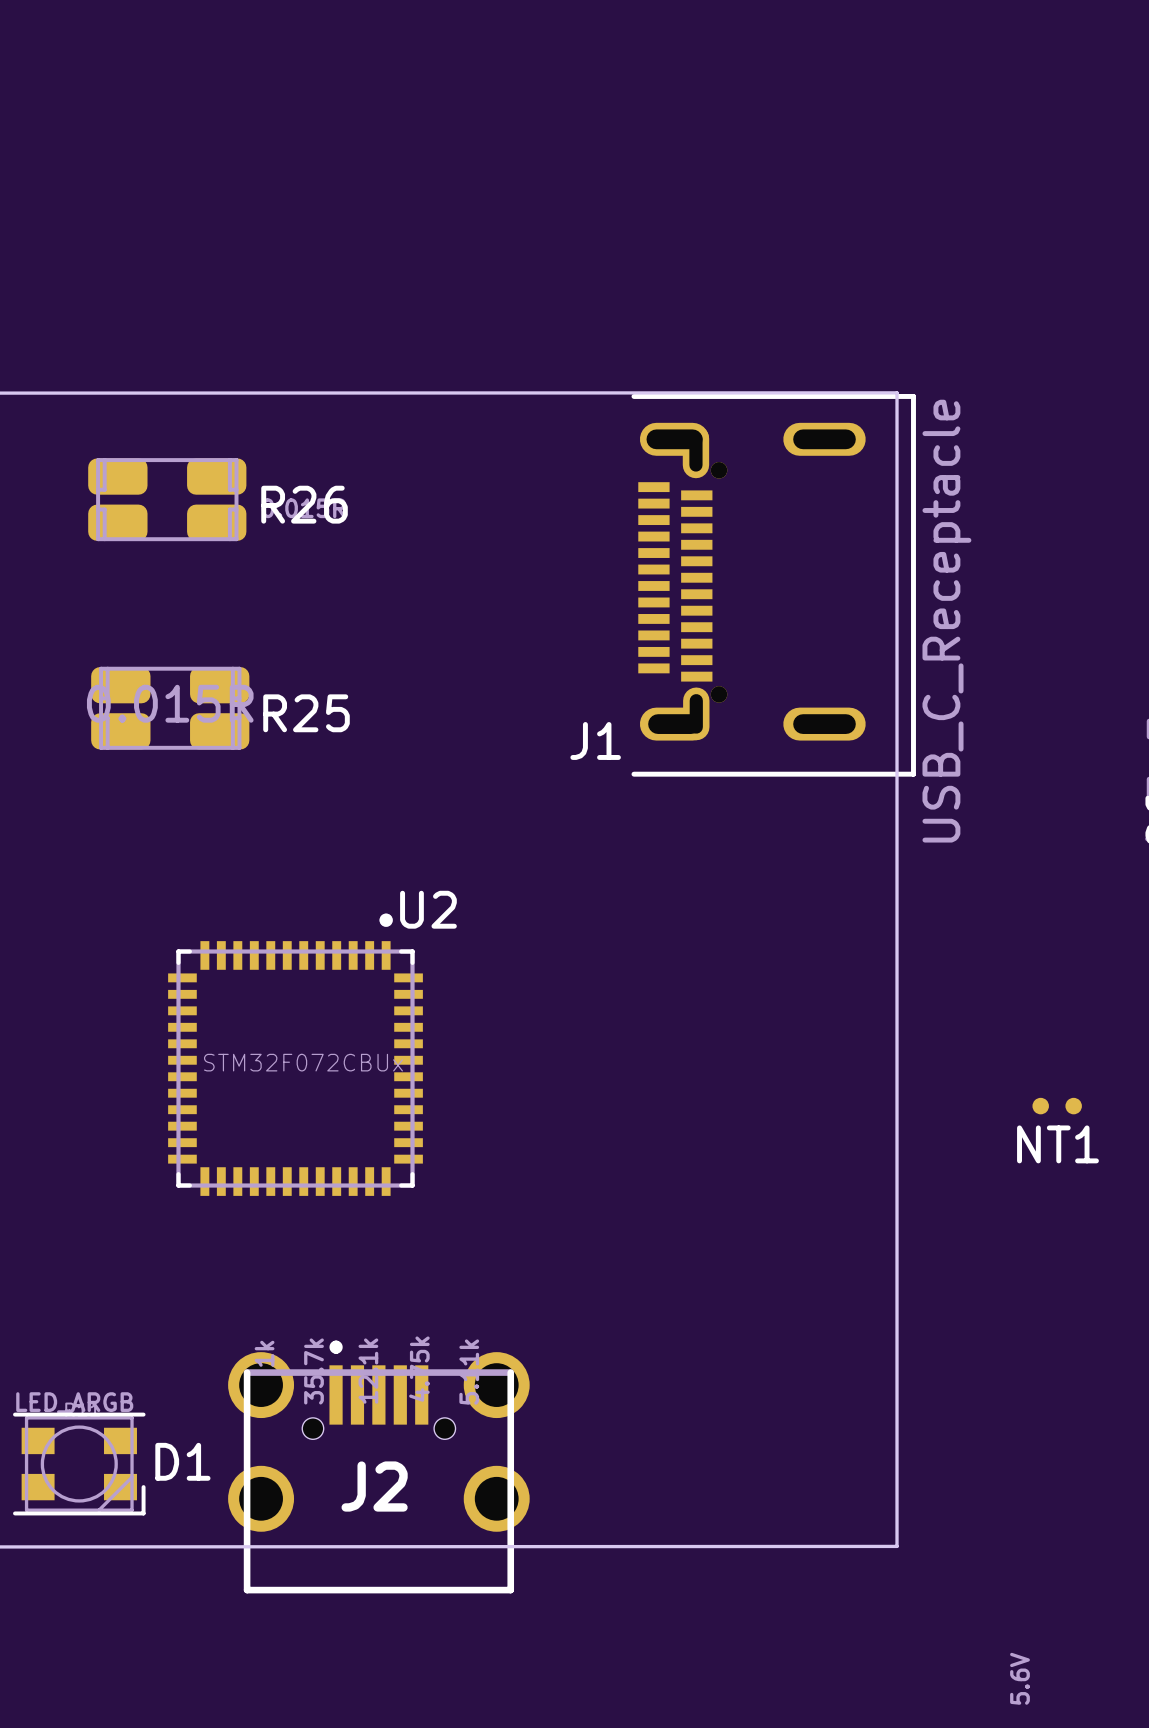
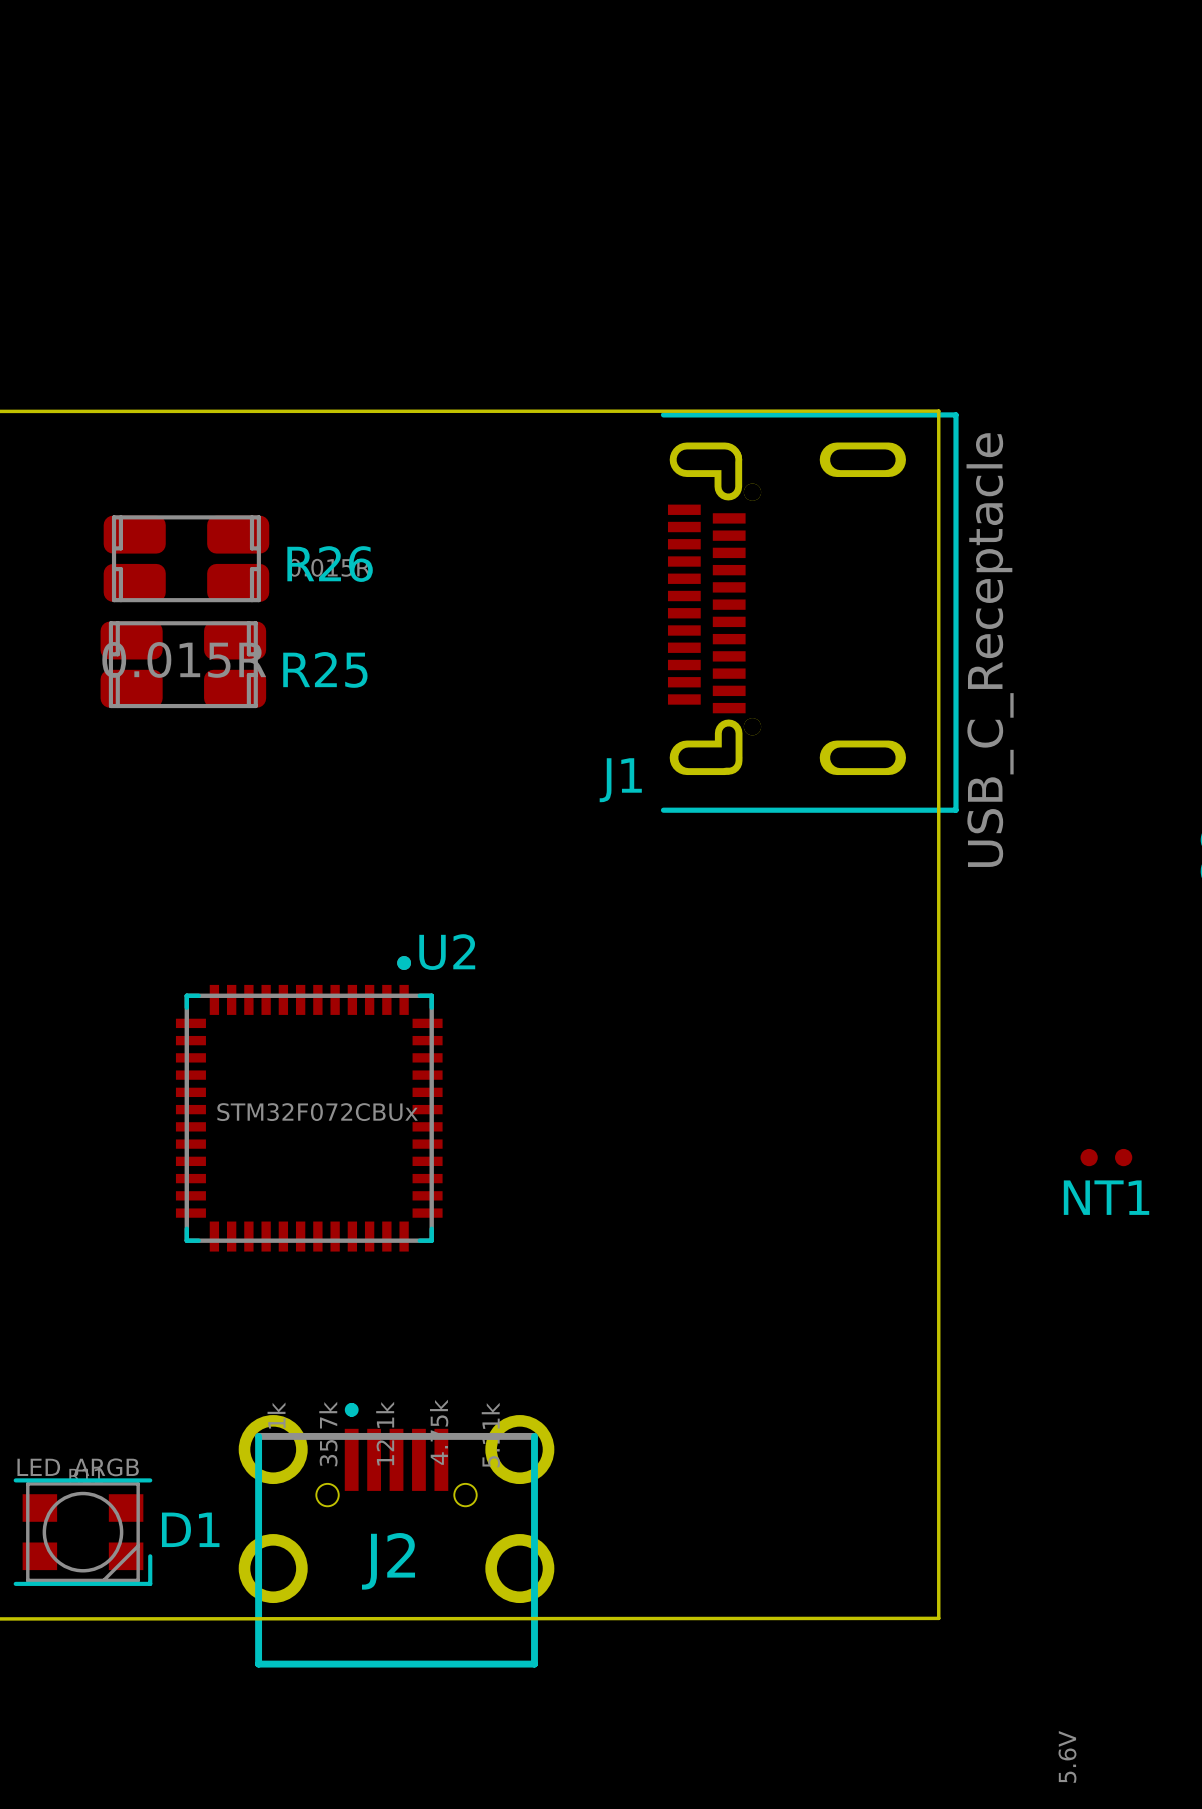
R26 position: (167, 499) -> (186, 558)
R25 position: (170, 708) -> (183, 664)

